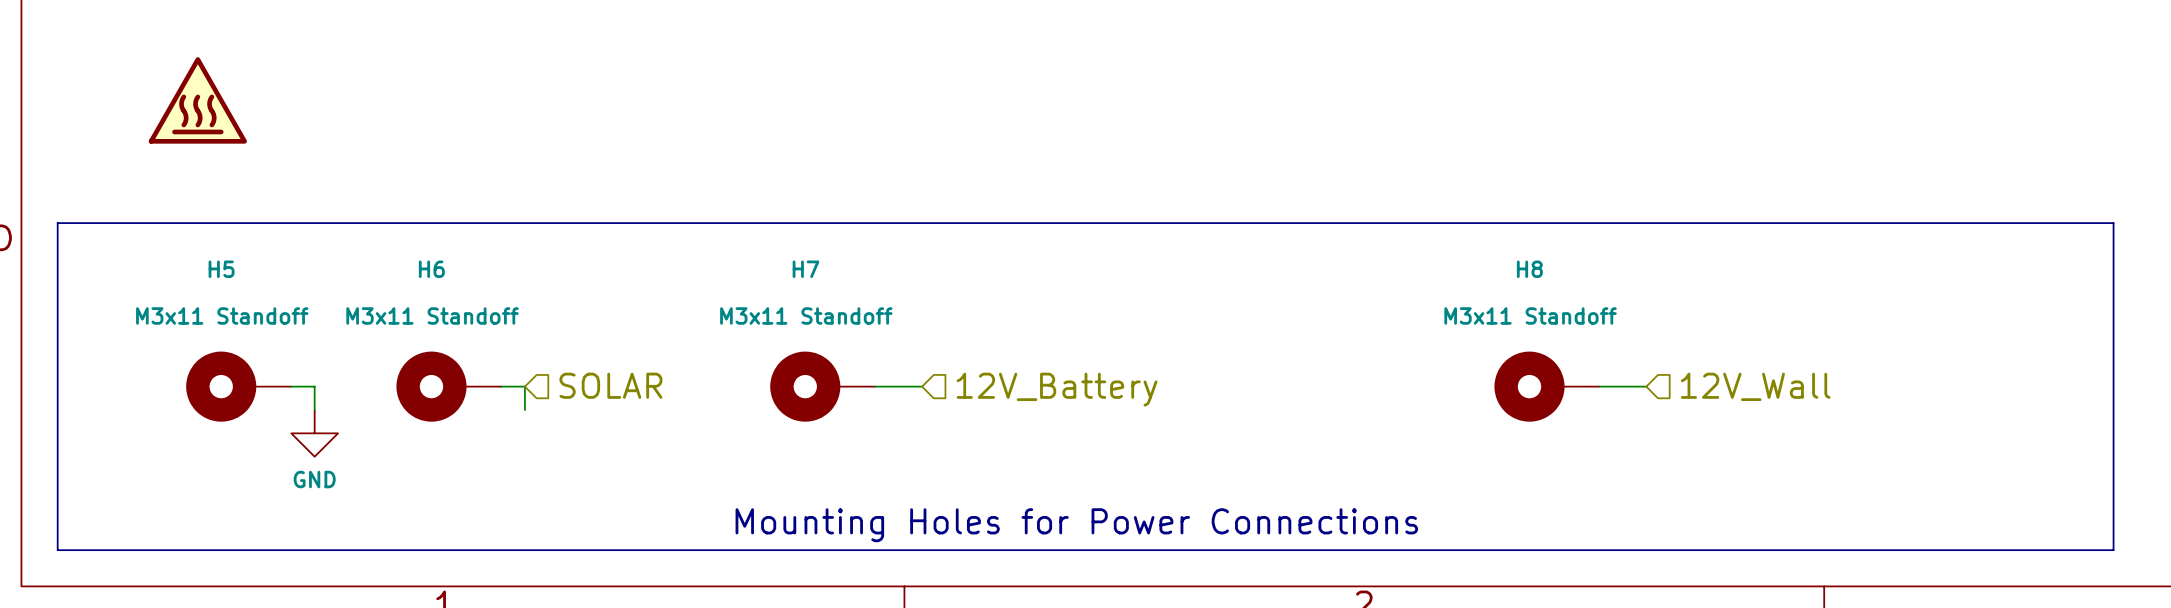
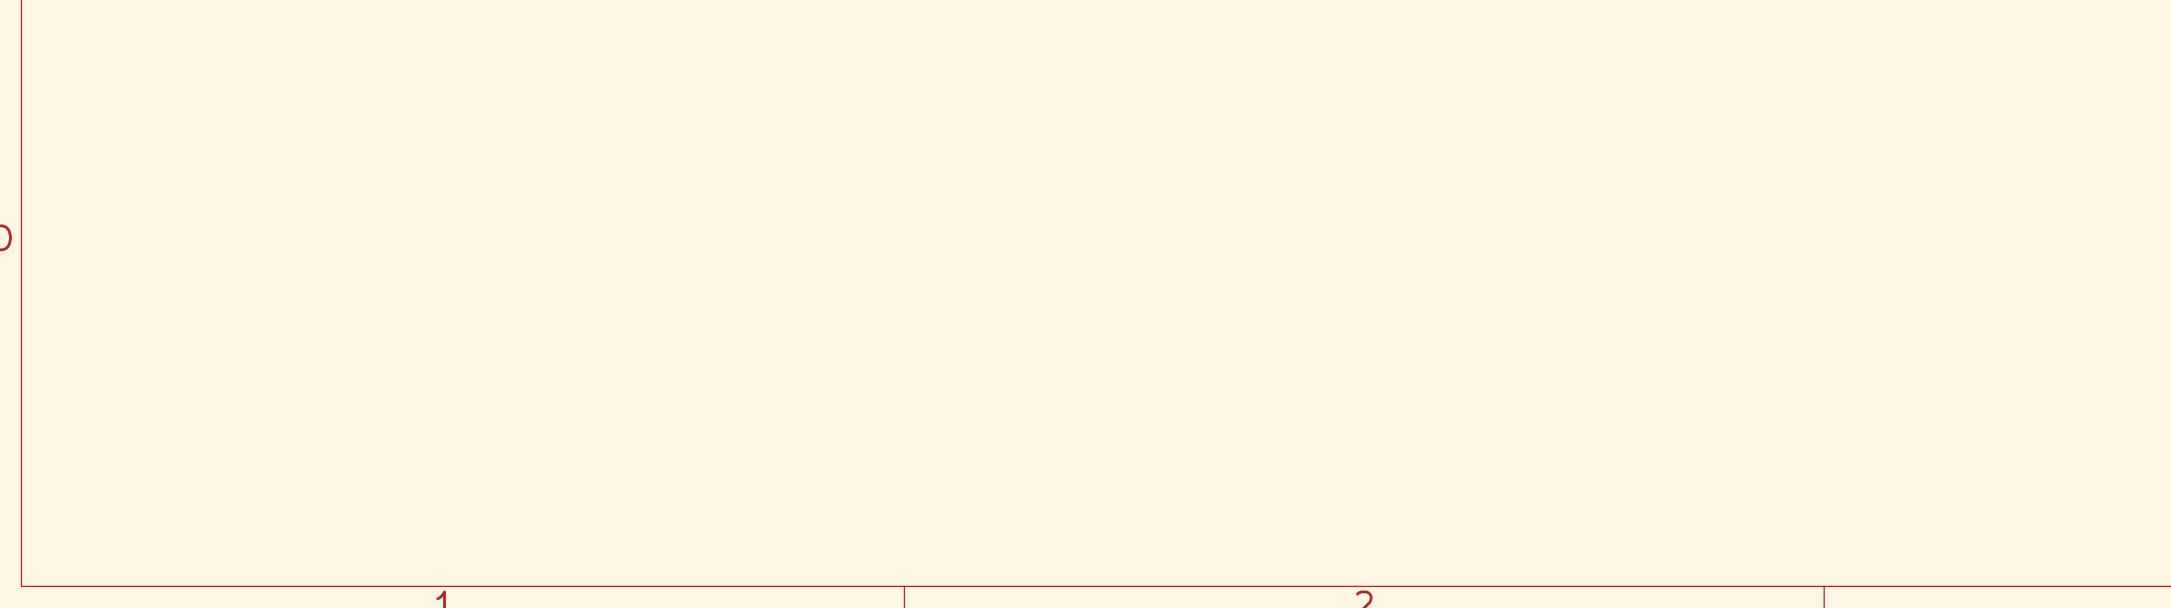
part: (197, 100) -> none
line: (57, 223) (2113, 223) (2113, 550) (57, 550) (57, 223) -> none
hierarchical label: SOLAR (610, 385) -> none
H5: M3x11 Standoff (238, 386) -> none
wire: (291, 386) (314, 386) (314, 409) -> none
H6: M3x11 Standoff (449, 386) -> none
wire: (501, 386) (524, 386) (524, 409) -> none
H7: M3x11 Standoff (822, 386) -> none
wire: (875, 386) (922, 386) -> none
H8: M3x11 Standoff (1547, 386) -> none
wire: (1599, 386) (1646, 386) -> none
hierarchical label: 12V_Wall (1755, 386) -> none
hierarchical label: 12V_Battery (1057, 389) -> none
power symbol: GND (314, 433) -> none
text: Mounting Holes for Power Connections (1076, 525) -> none

